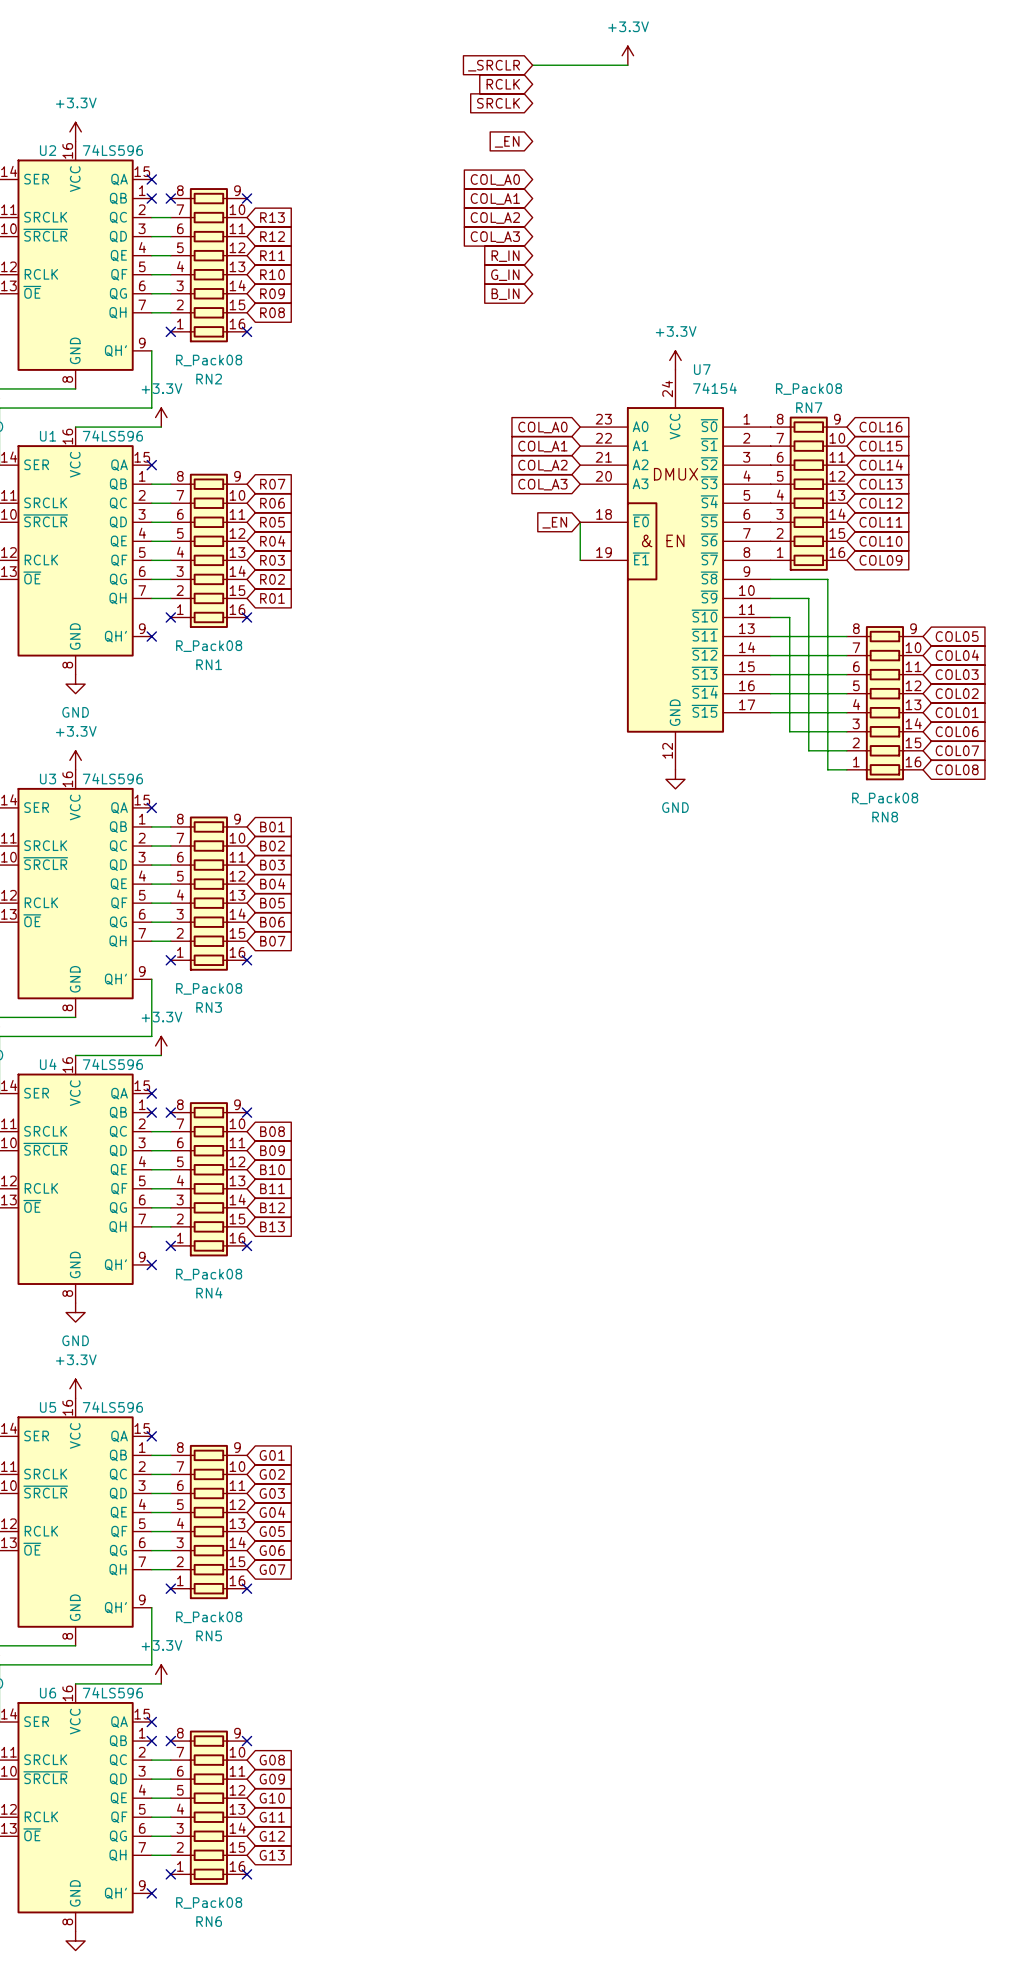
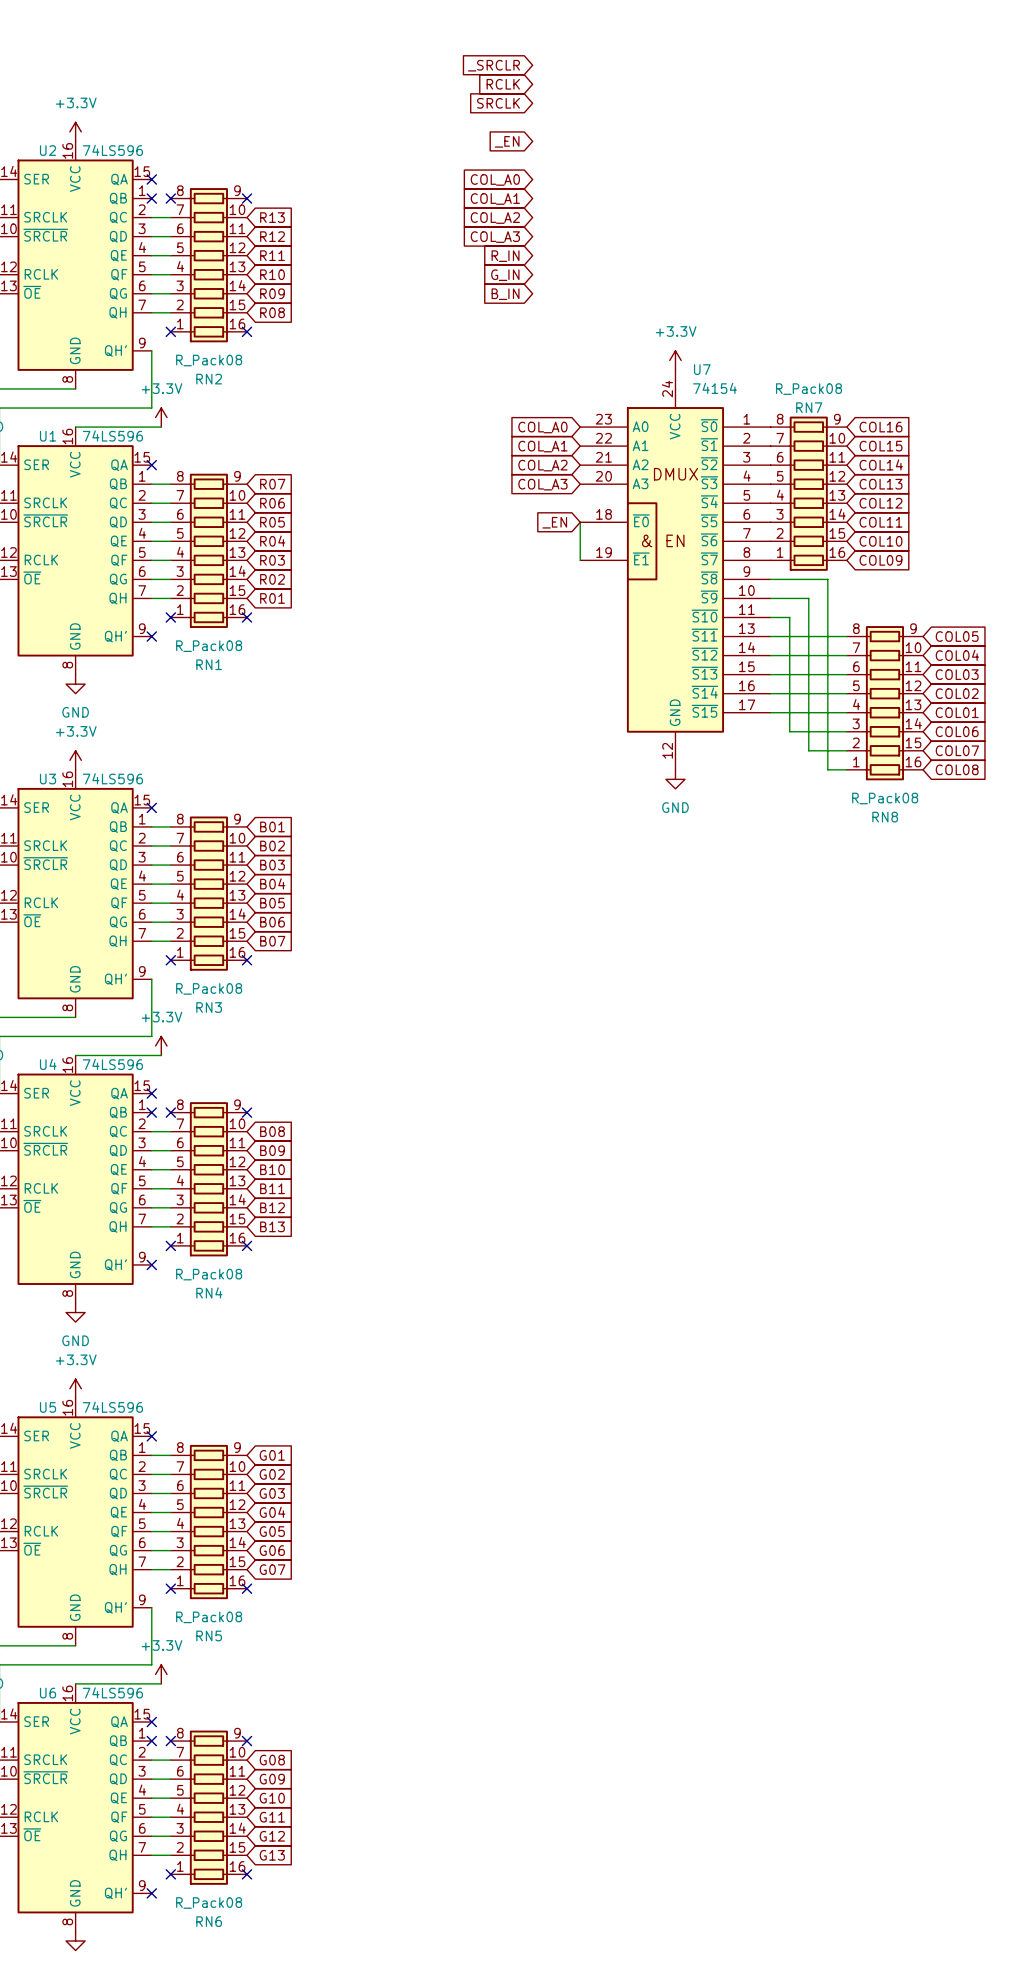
power symbol: +3.3V (627, 55) -> none
wire: (532, 65) (627, 65) -> none

